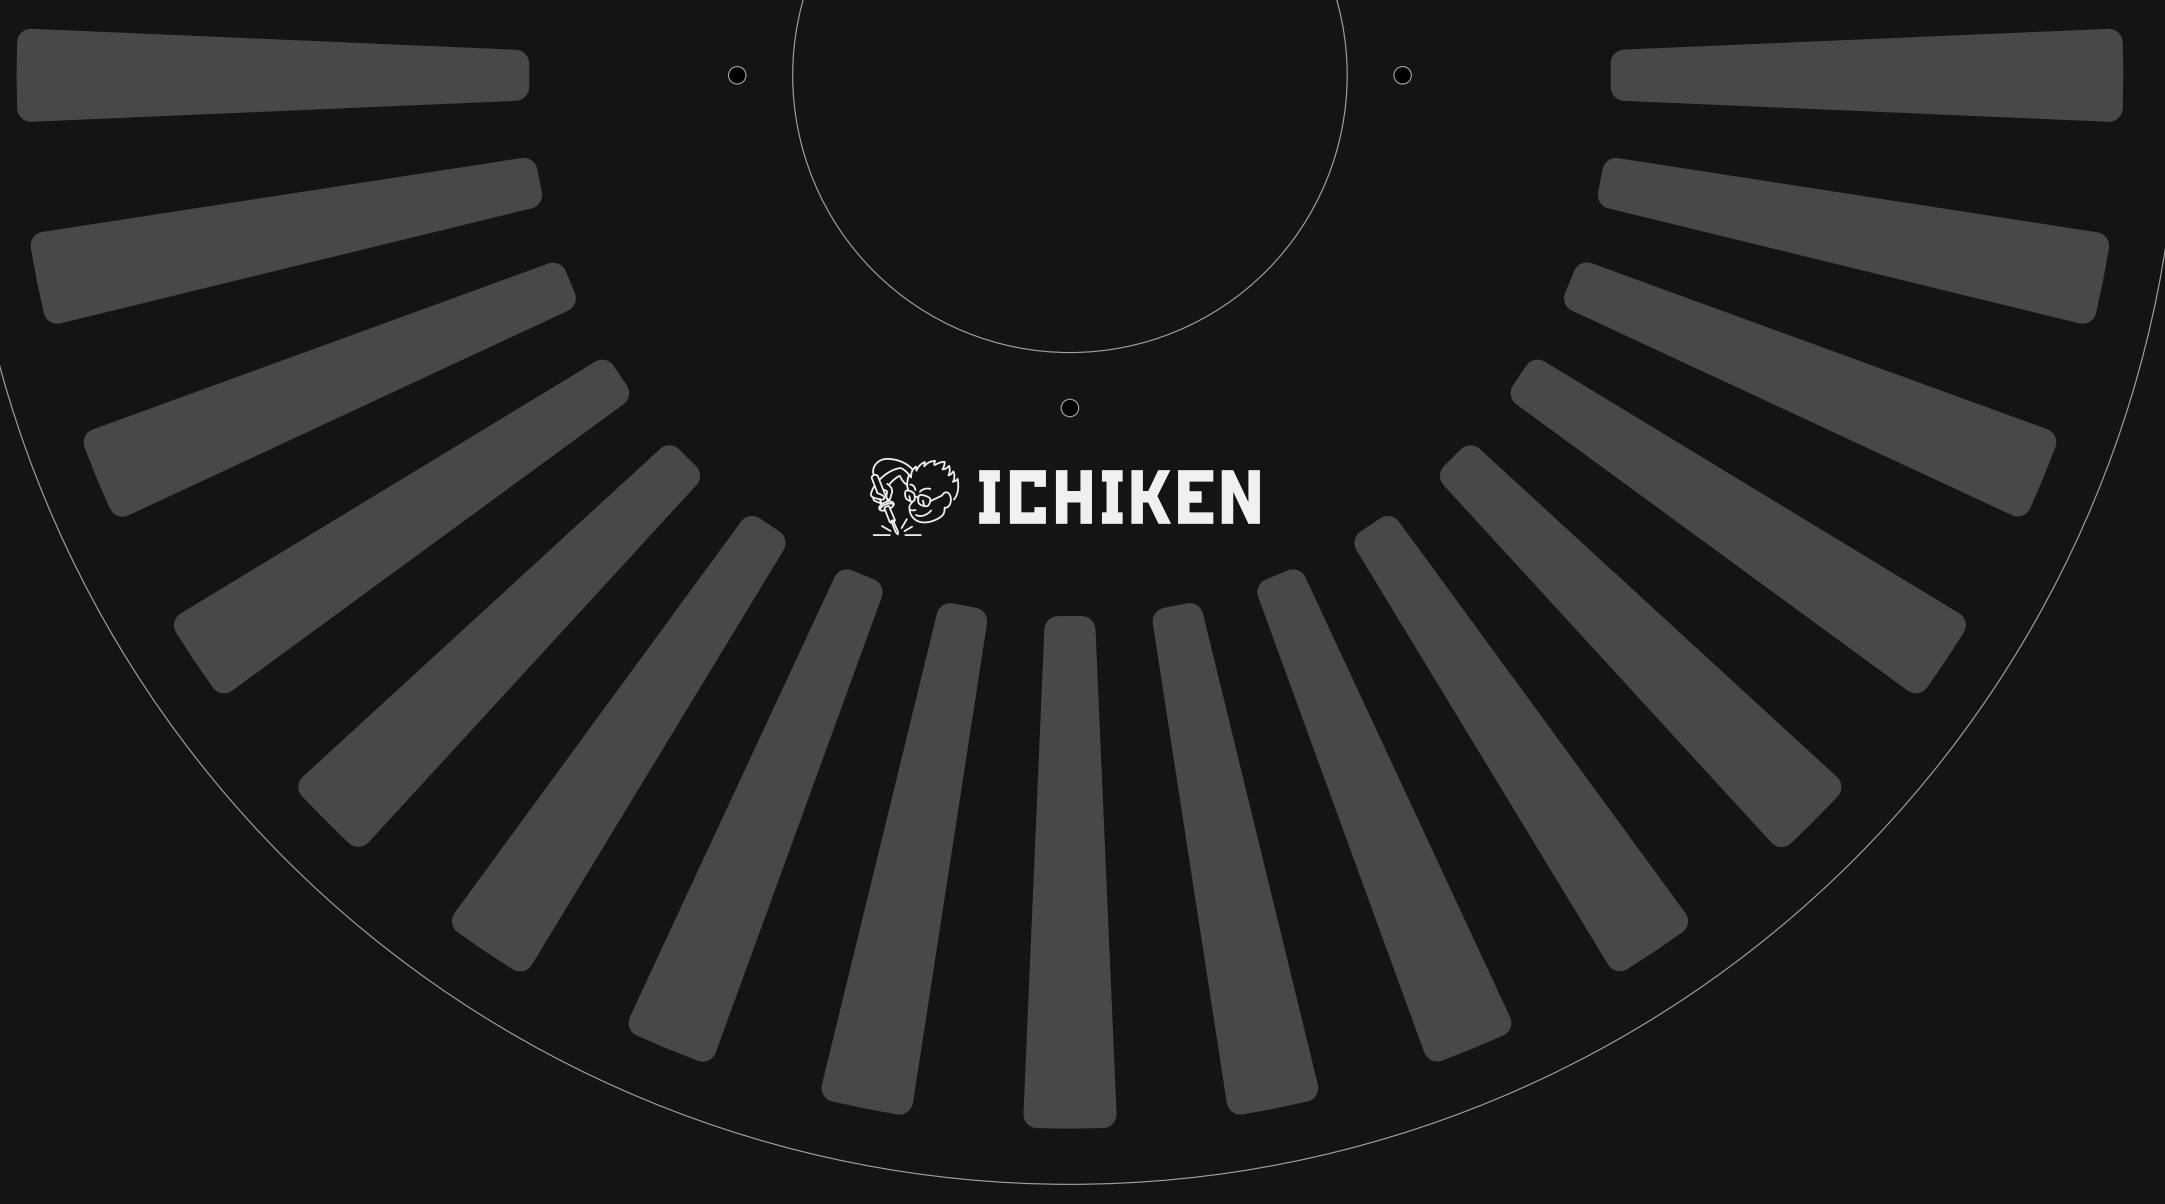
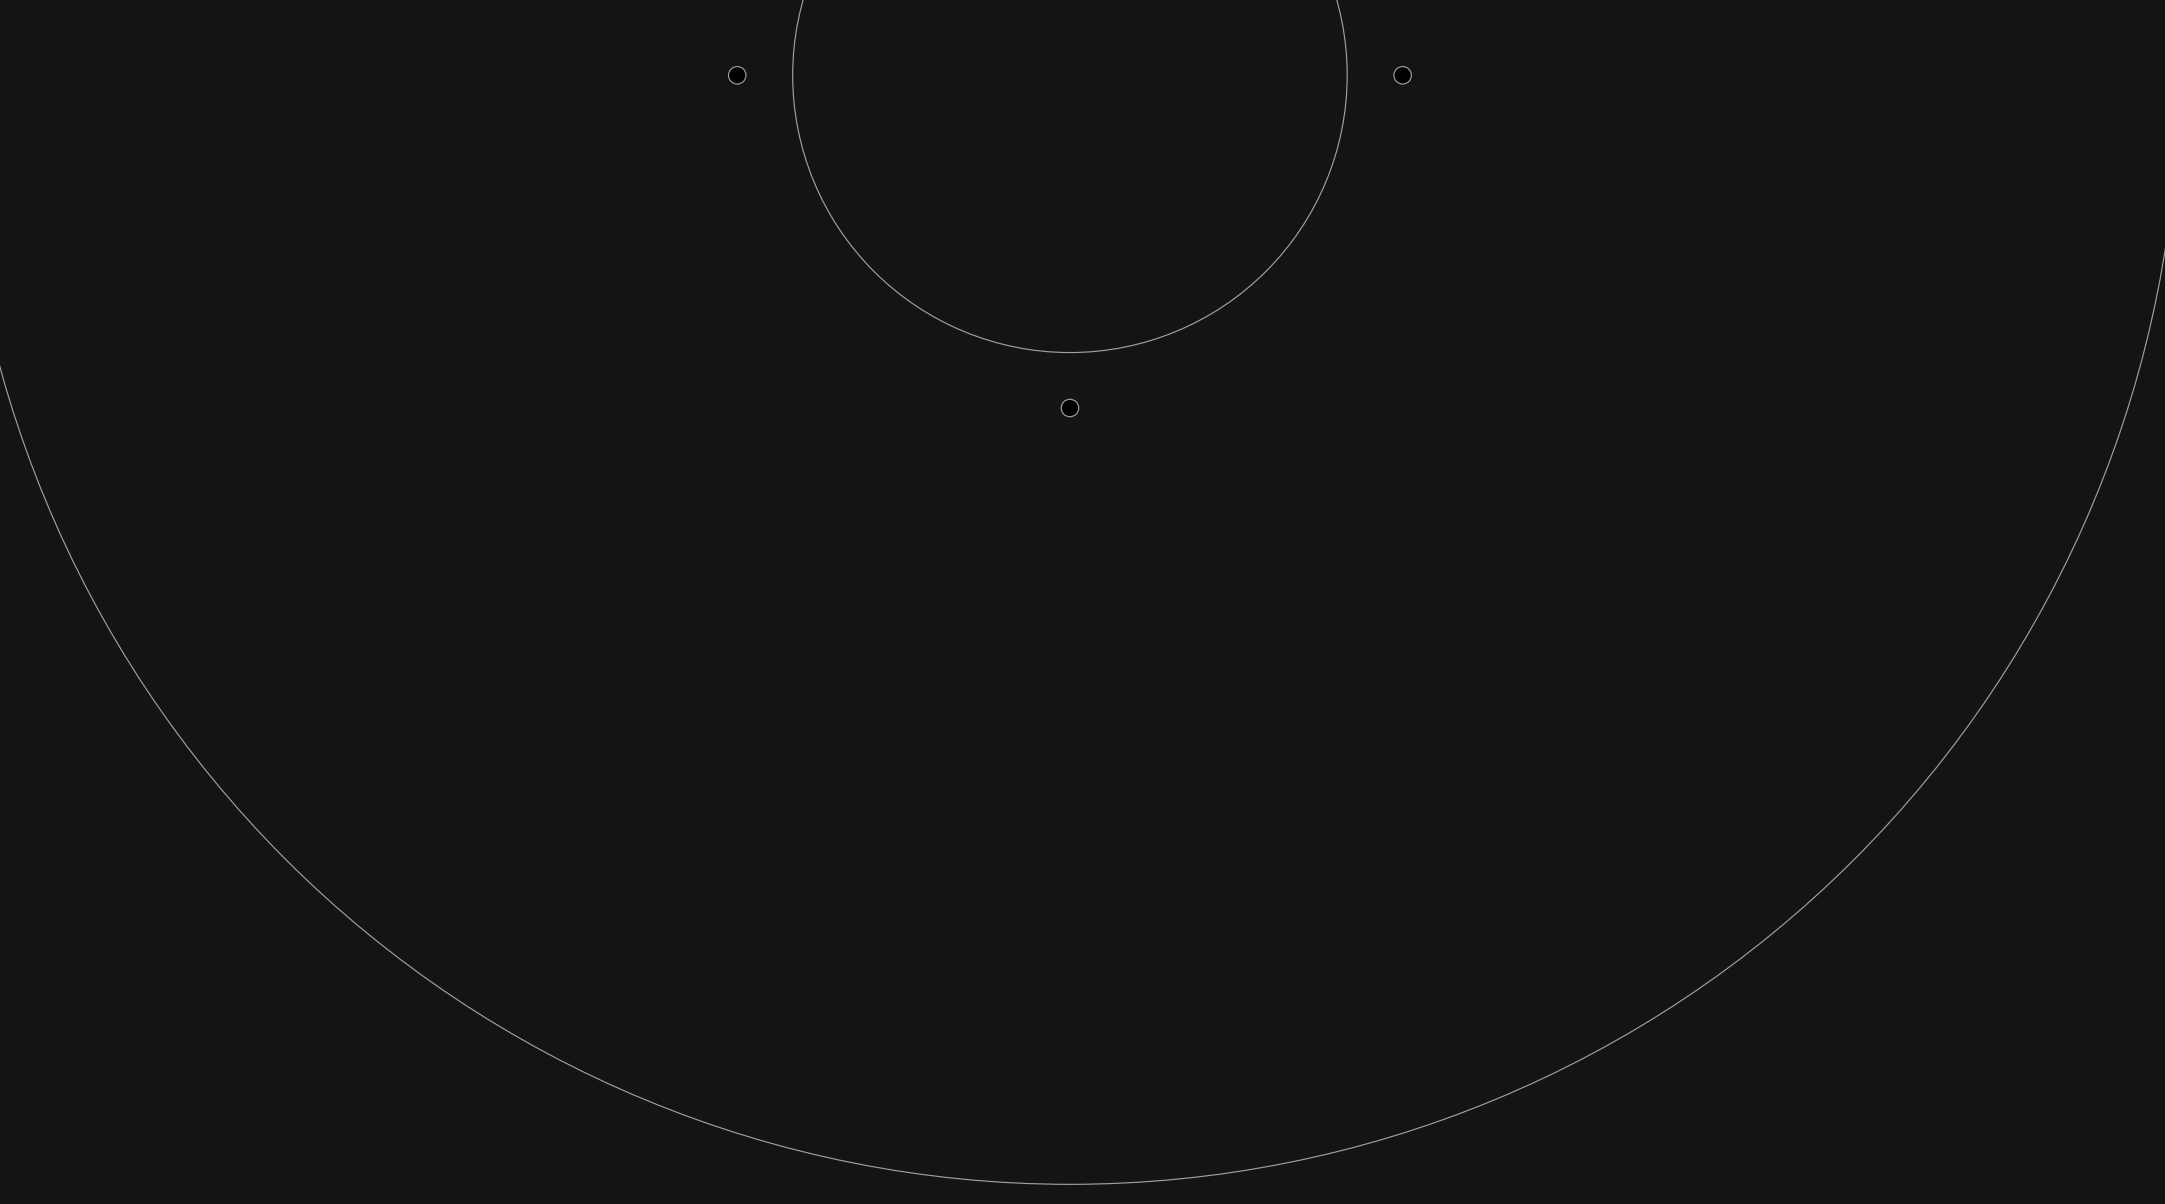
drawing: [16, 28, 530, 122] -> none
drawing: [1610, 28, 2124, 122] -> none
drawing: [30, 157, 988, 1115] -> none
drawing: [1152, 158, 2110, 1115] -> none
drawing: [870, 458, 960, 536] -> none
drawing: [979, 470, 1000, 524] -> none
drawing: [1009, 470, 1046, 524] -> none
drawing: [1055, 470, 1092, 524] -> none
drawing: [1101, 470, 1123, 524] -> none
drawing: [1131, 470, 1172, 524] -> none
drawing: [1178, 470, 1214, 524] -> none
drawing: [1221, 470, 1260, 524] -> none
drawing: [1023, 616, 1117, 1129] -> none

